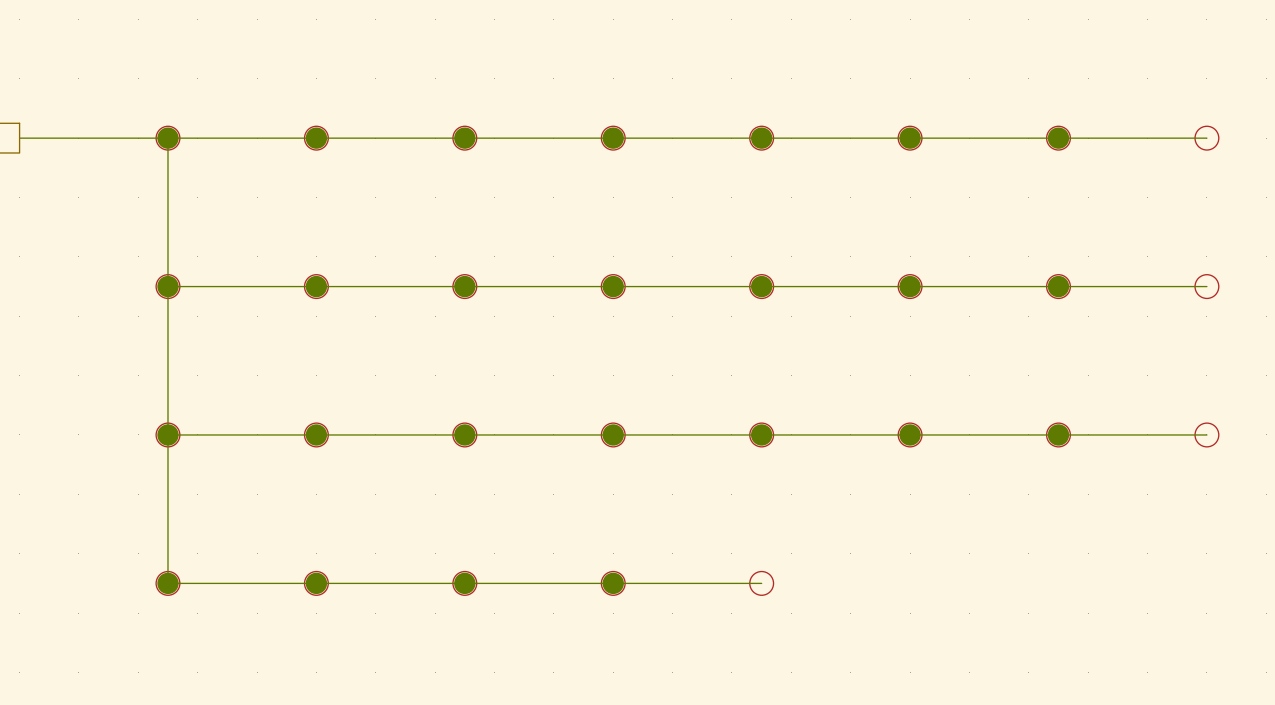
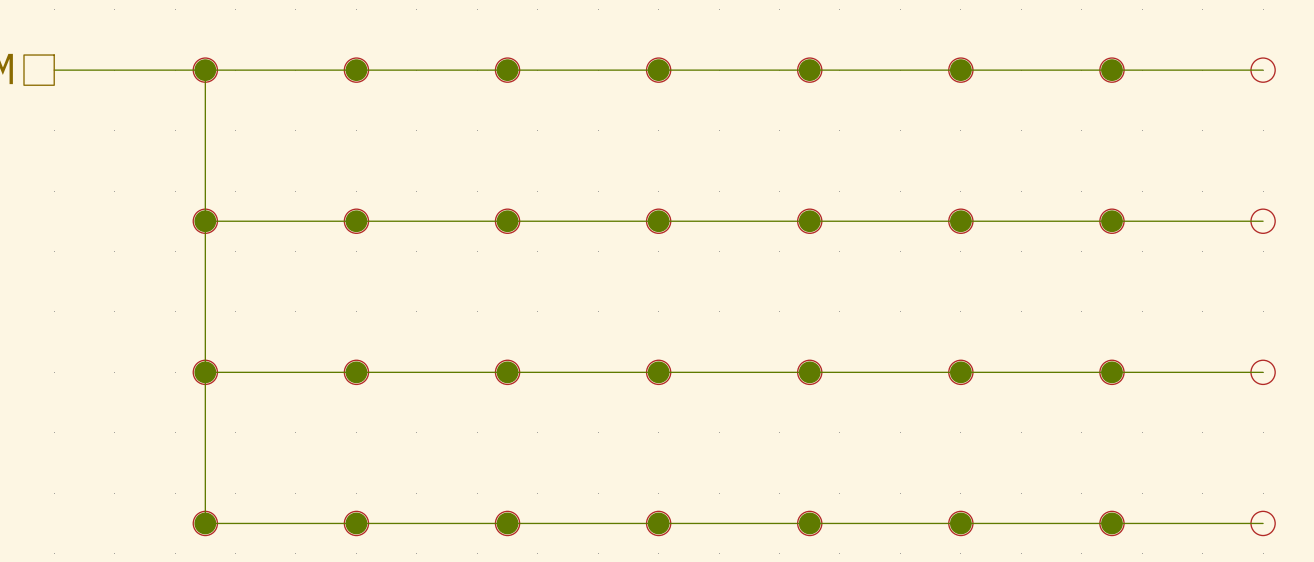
wire: none -> (809, 523) (1263, 523)
junction: none -> (809, 523)
junction: none -> (960, 523)
part: none -> (960, 523)
junction: none -> (1111, 523)
part: none -> (1111, 523)
part: none -> (1263, 523)

